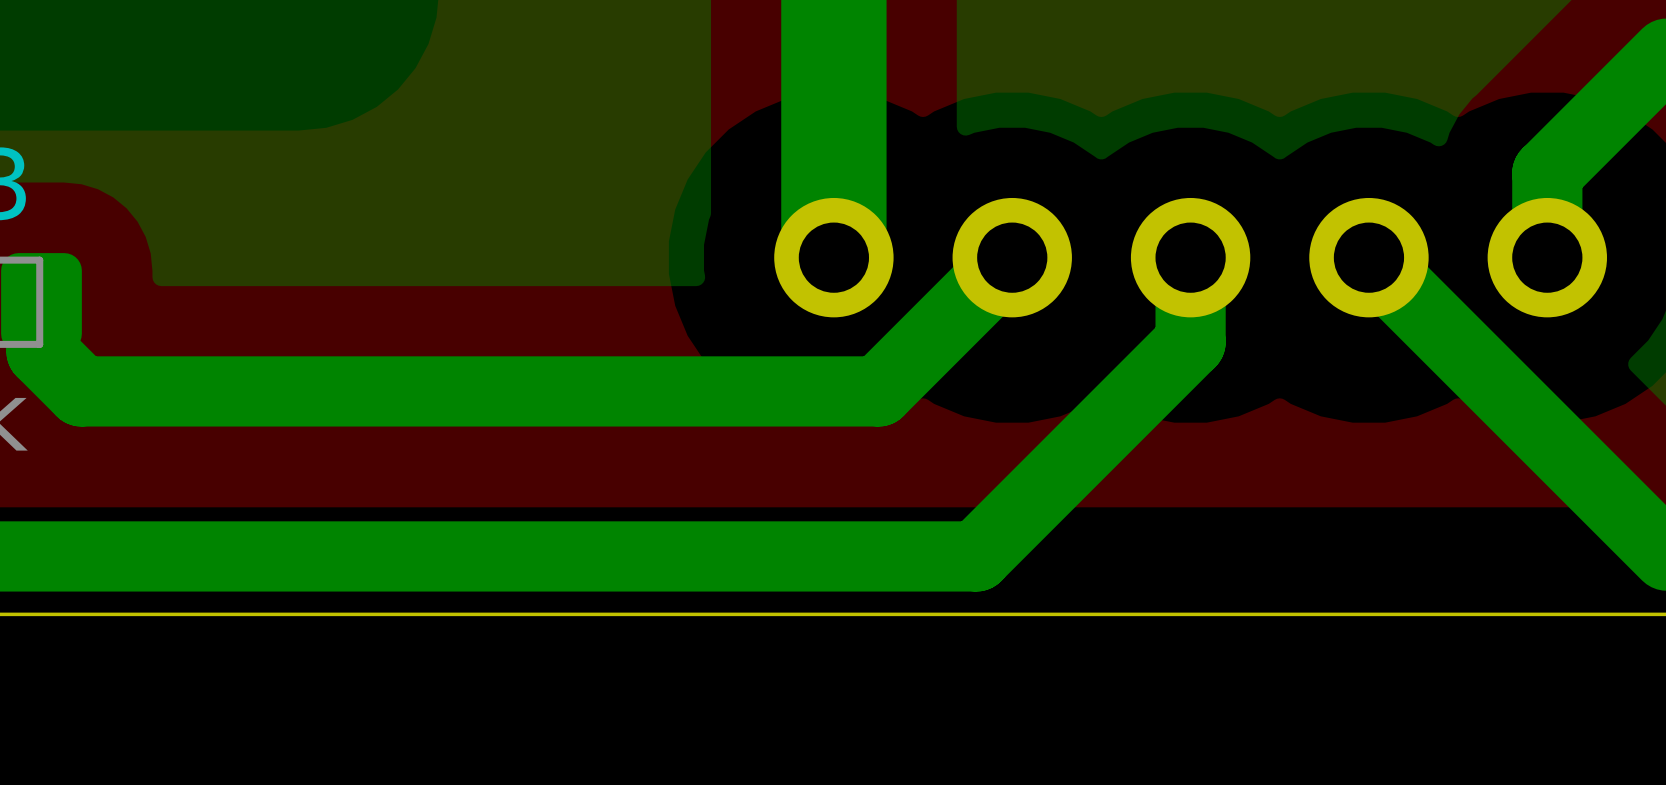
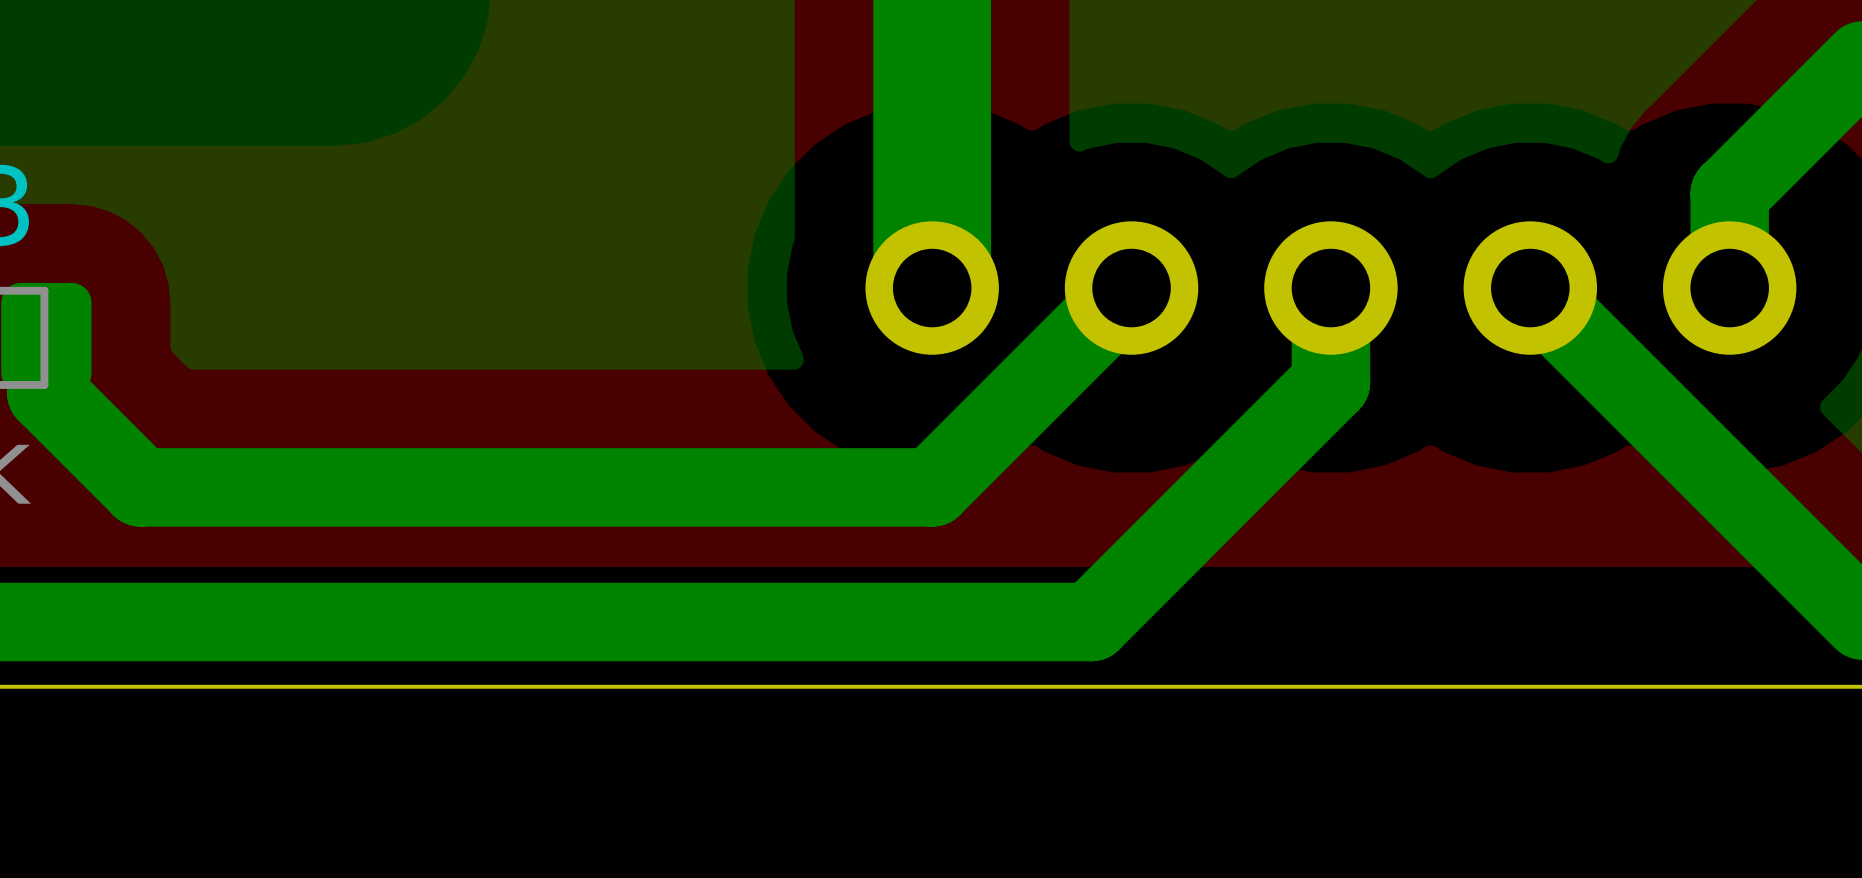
bottom track: (878, 391) (81, 391) -> (982, 437) (932, 487) (140, 487) (91, 437)

